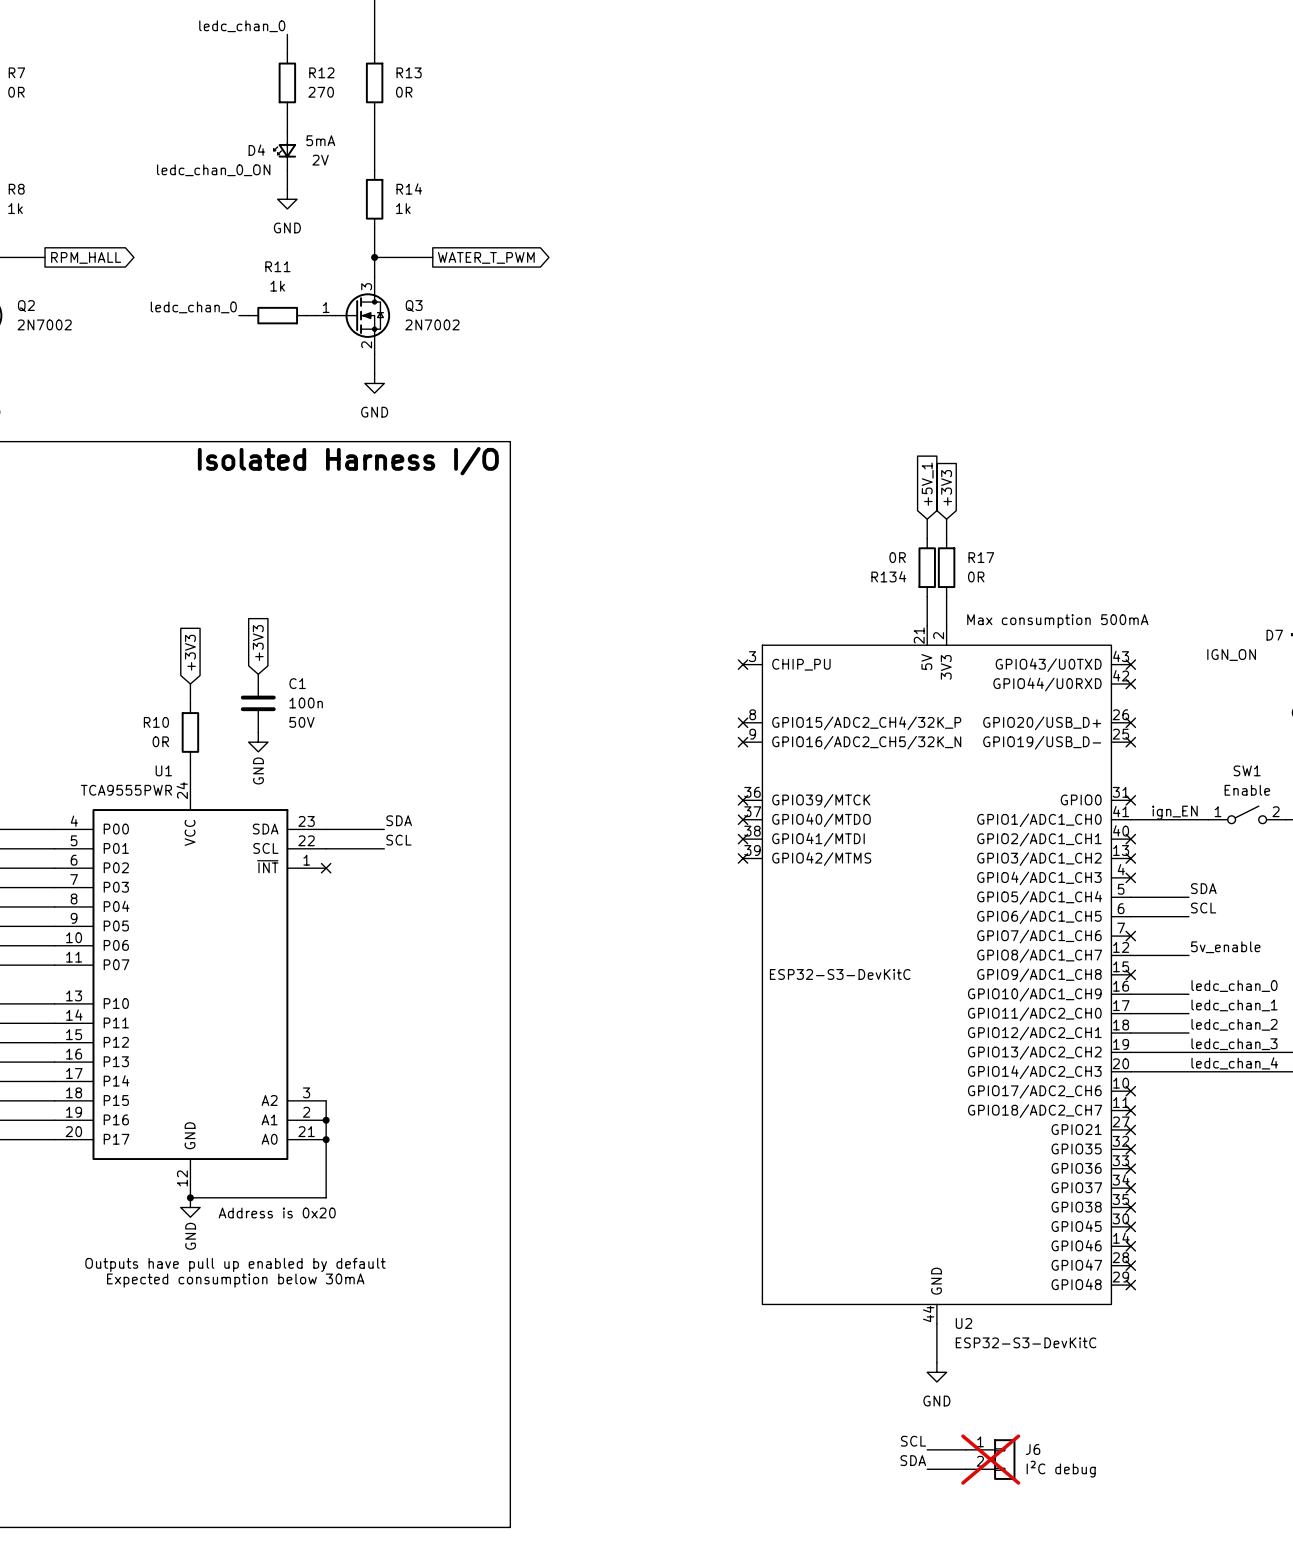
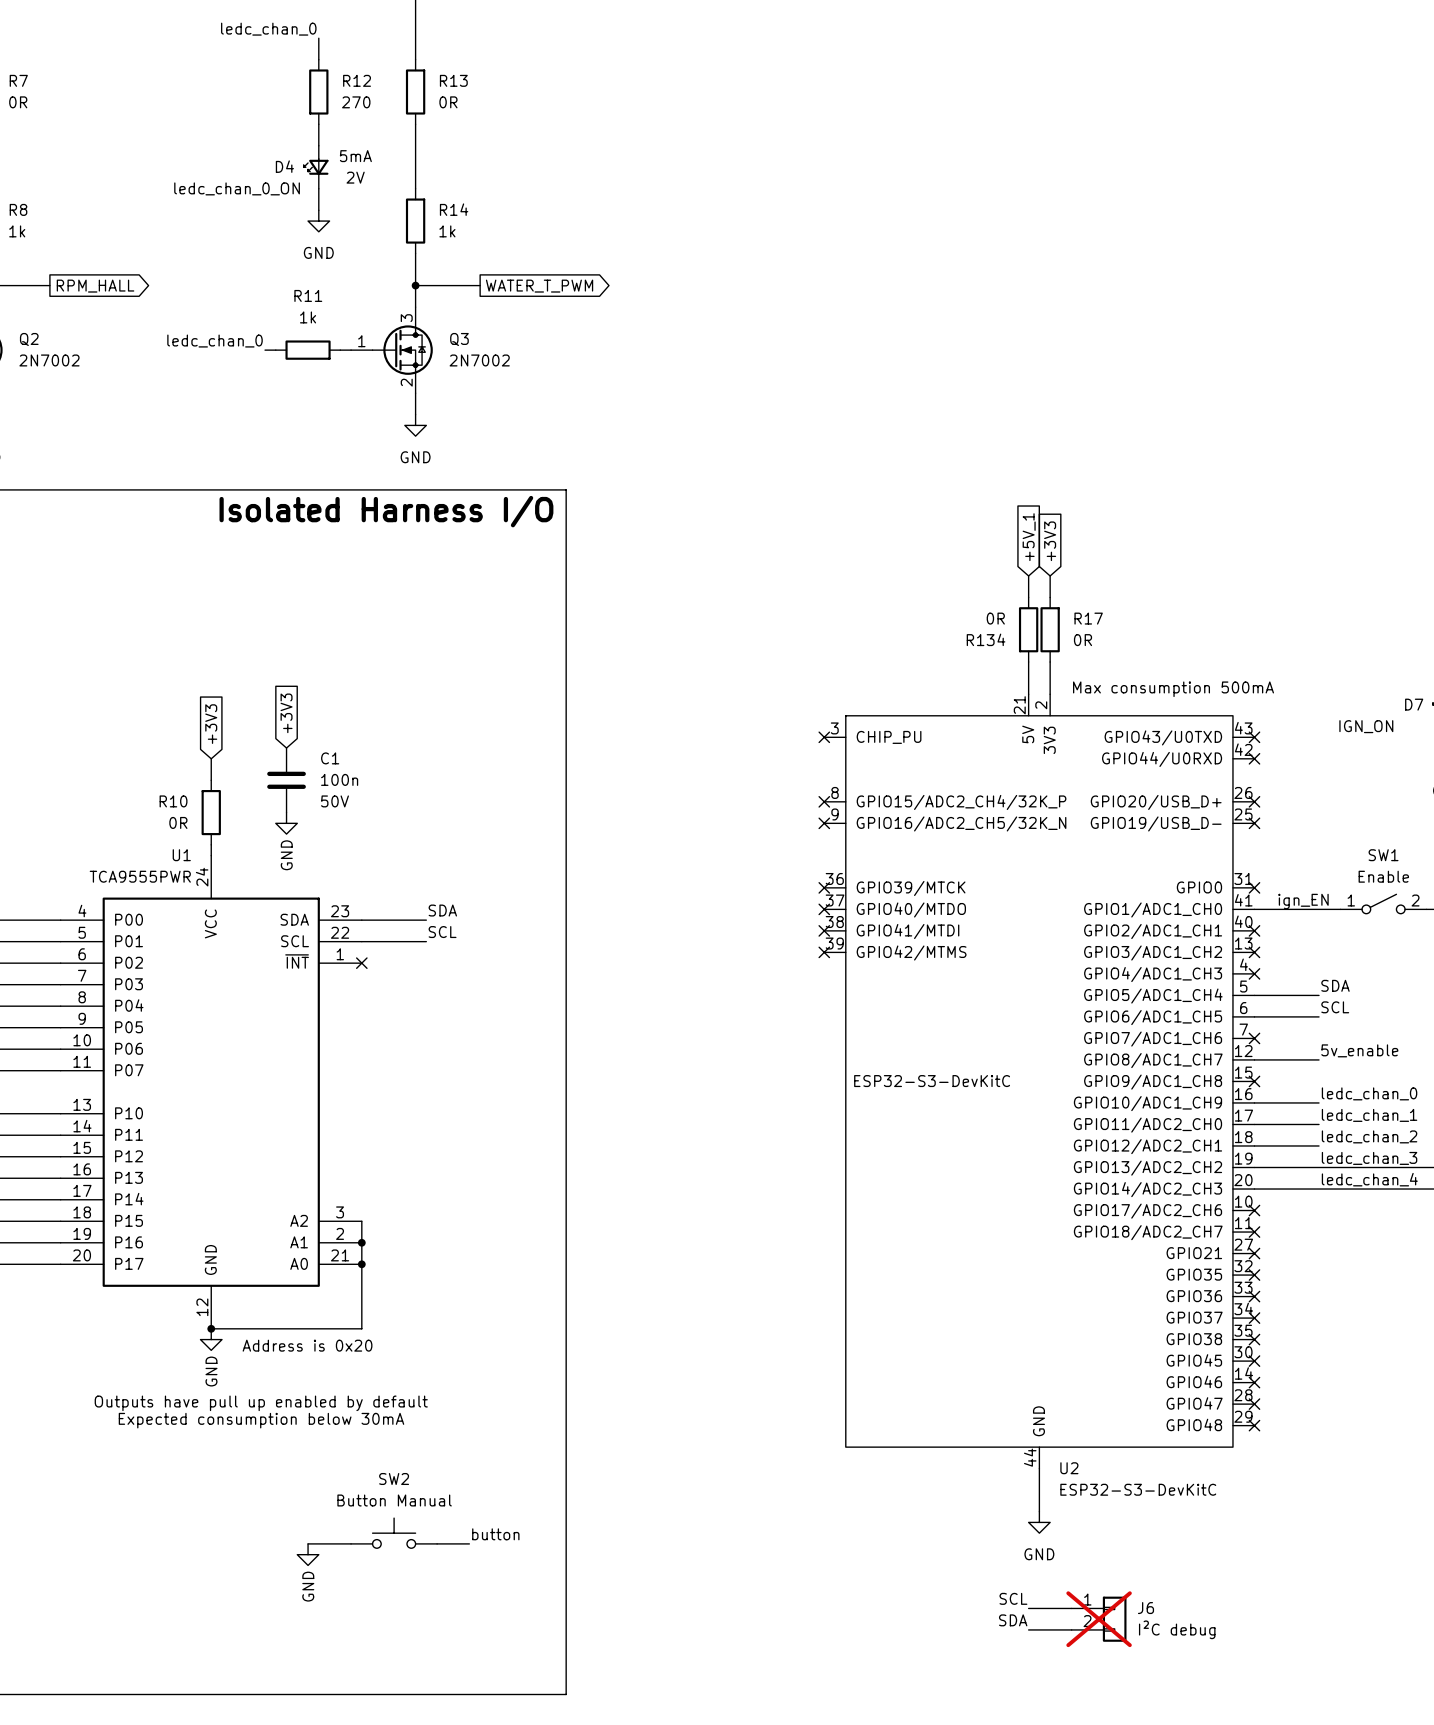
SW2: none -> Button Manual (394, 1533)
label: none -> button (495, 1534)
wire: none -> (308, 1543) (351, 1543)
wire: none -> (437, 1543) (469, 1543)
power symbol: none -> GND (308, 1554)

